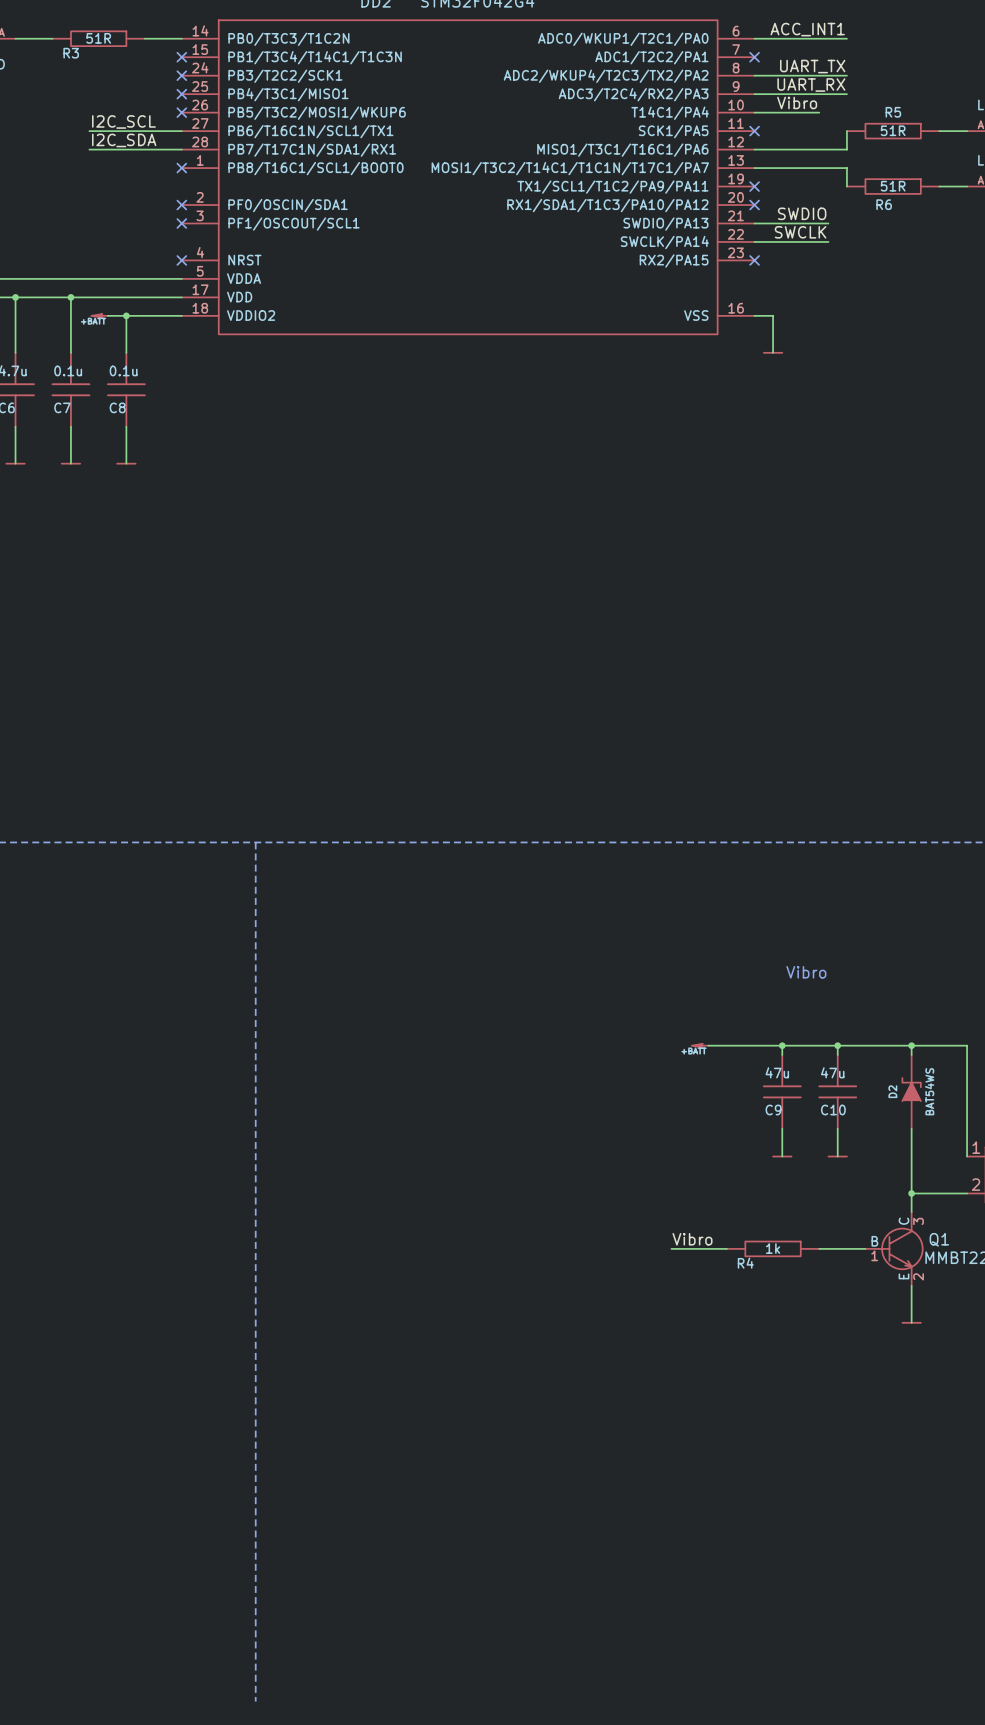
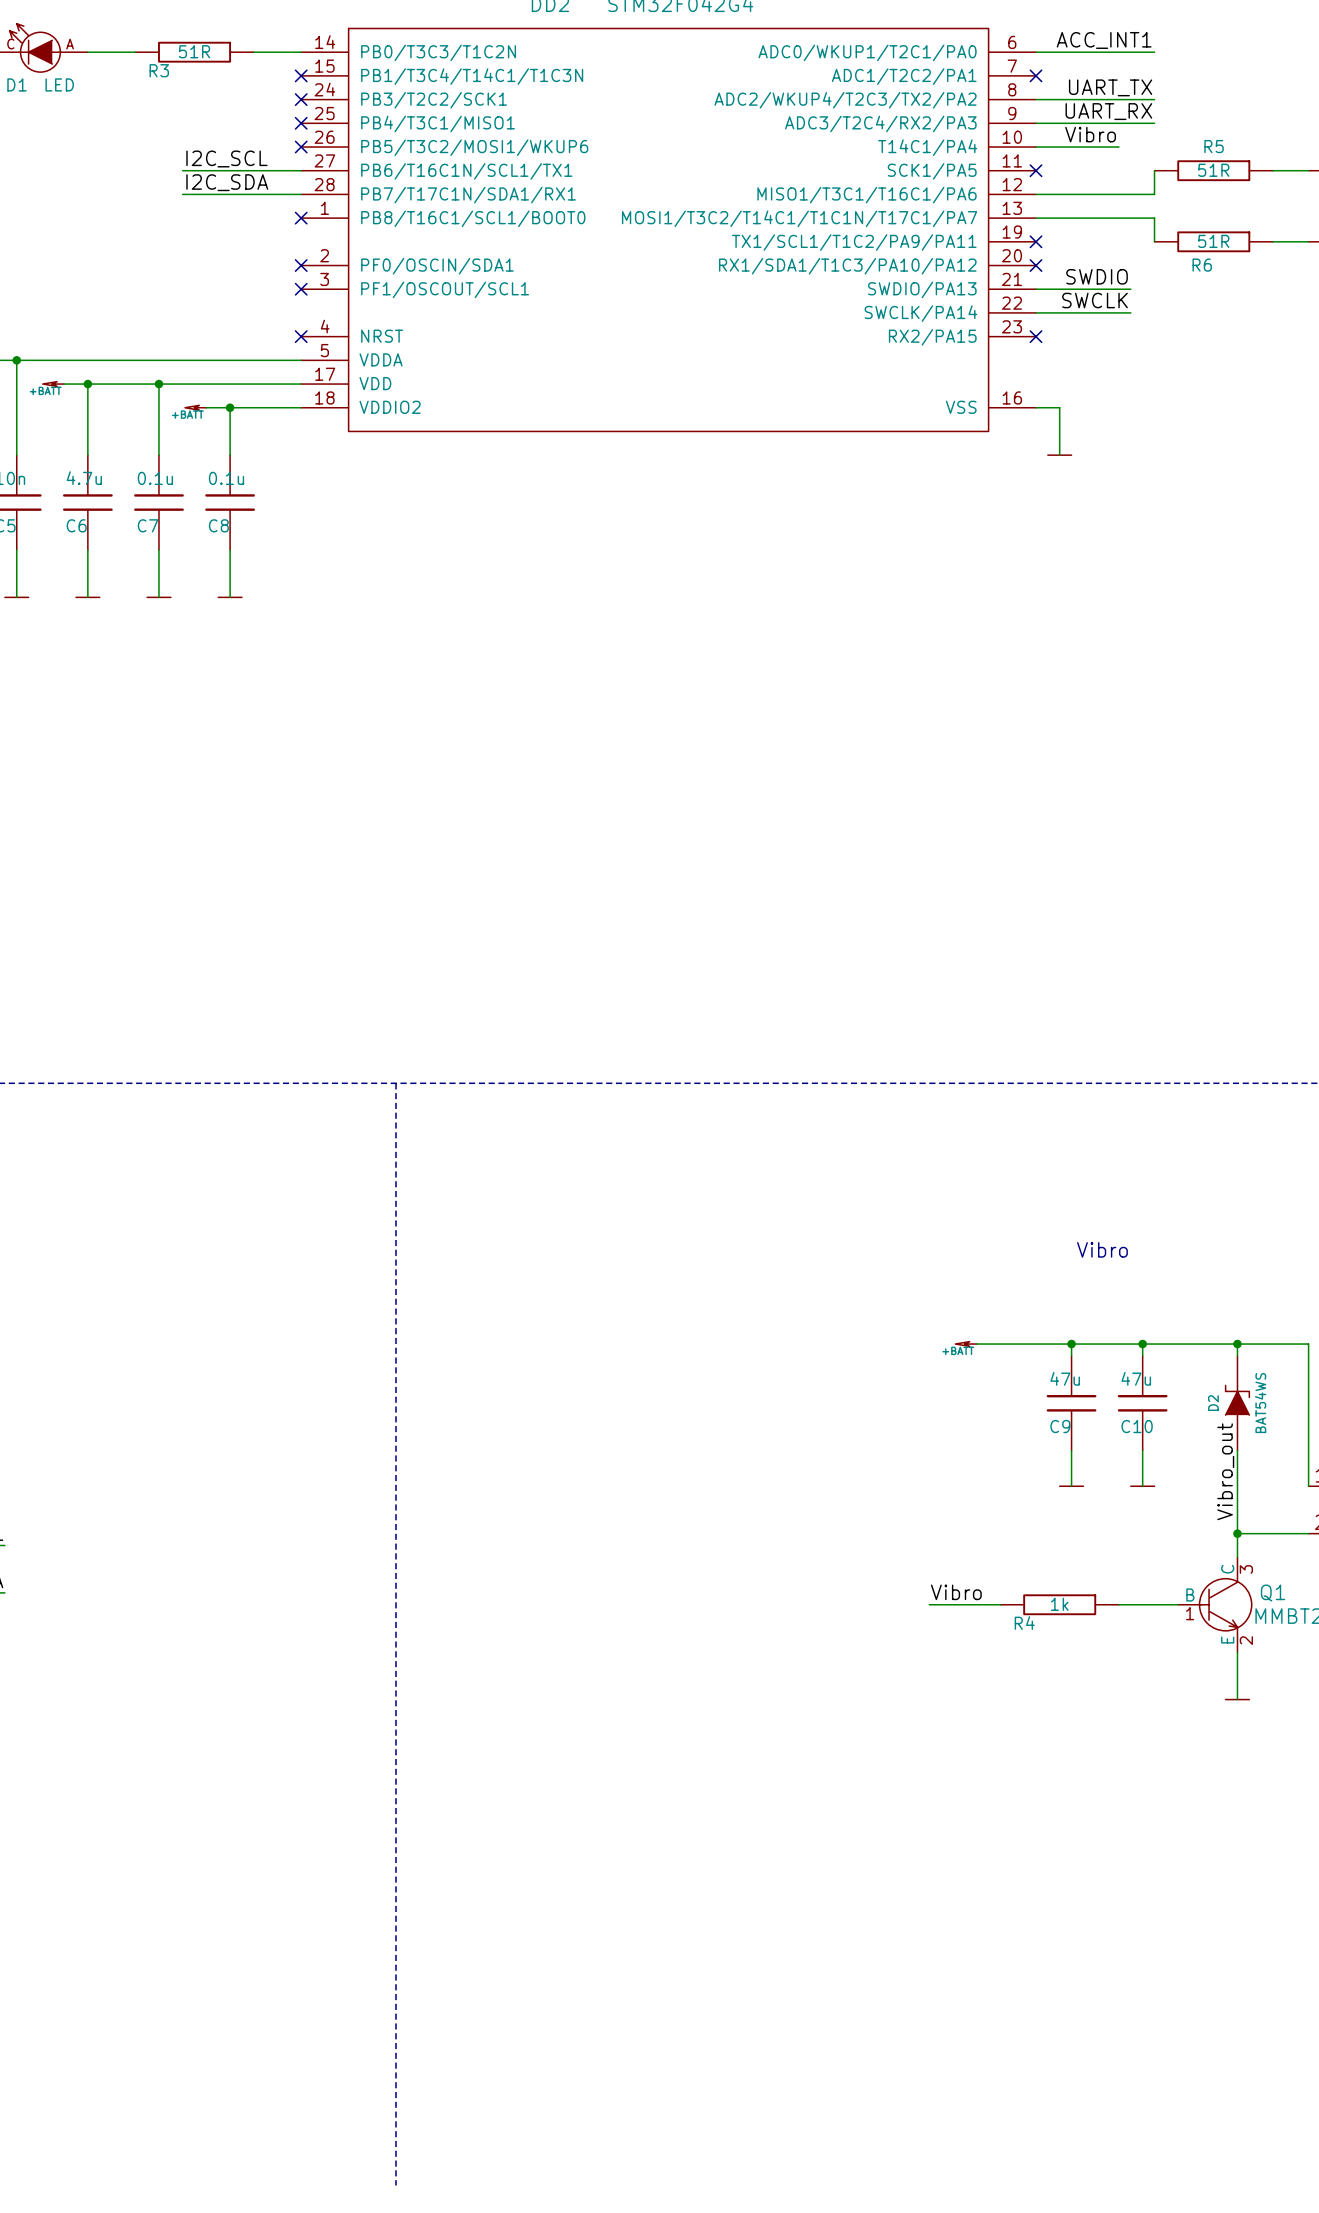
label: none -> Vibro_out (1225, 1471)

